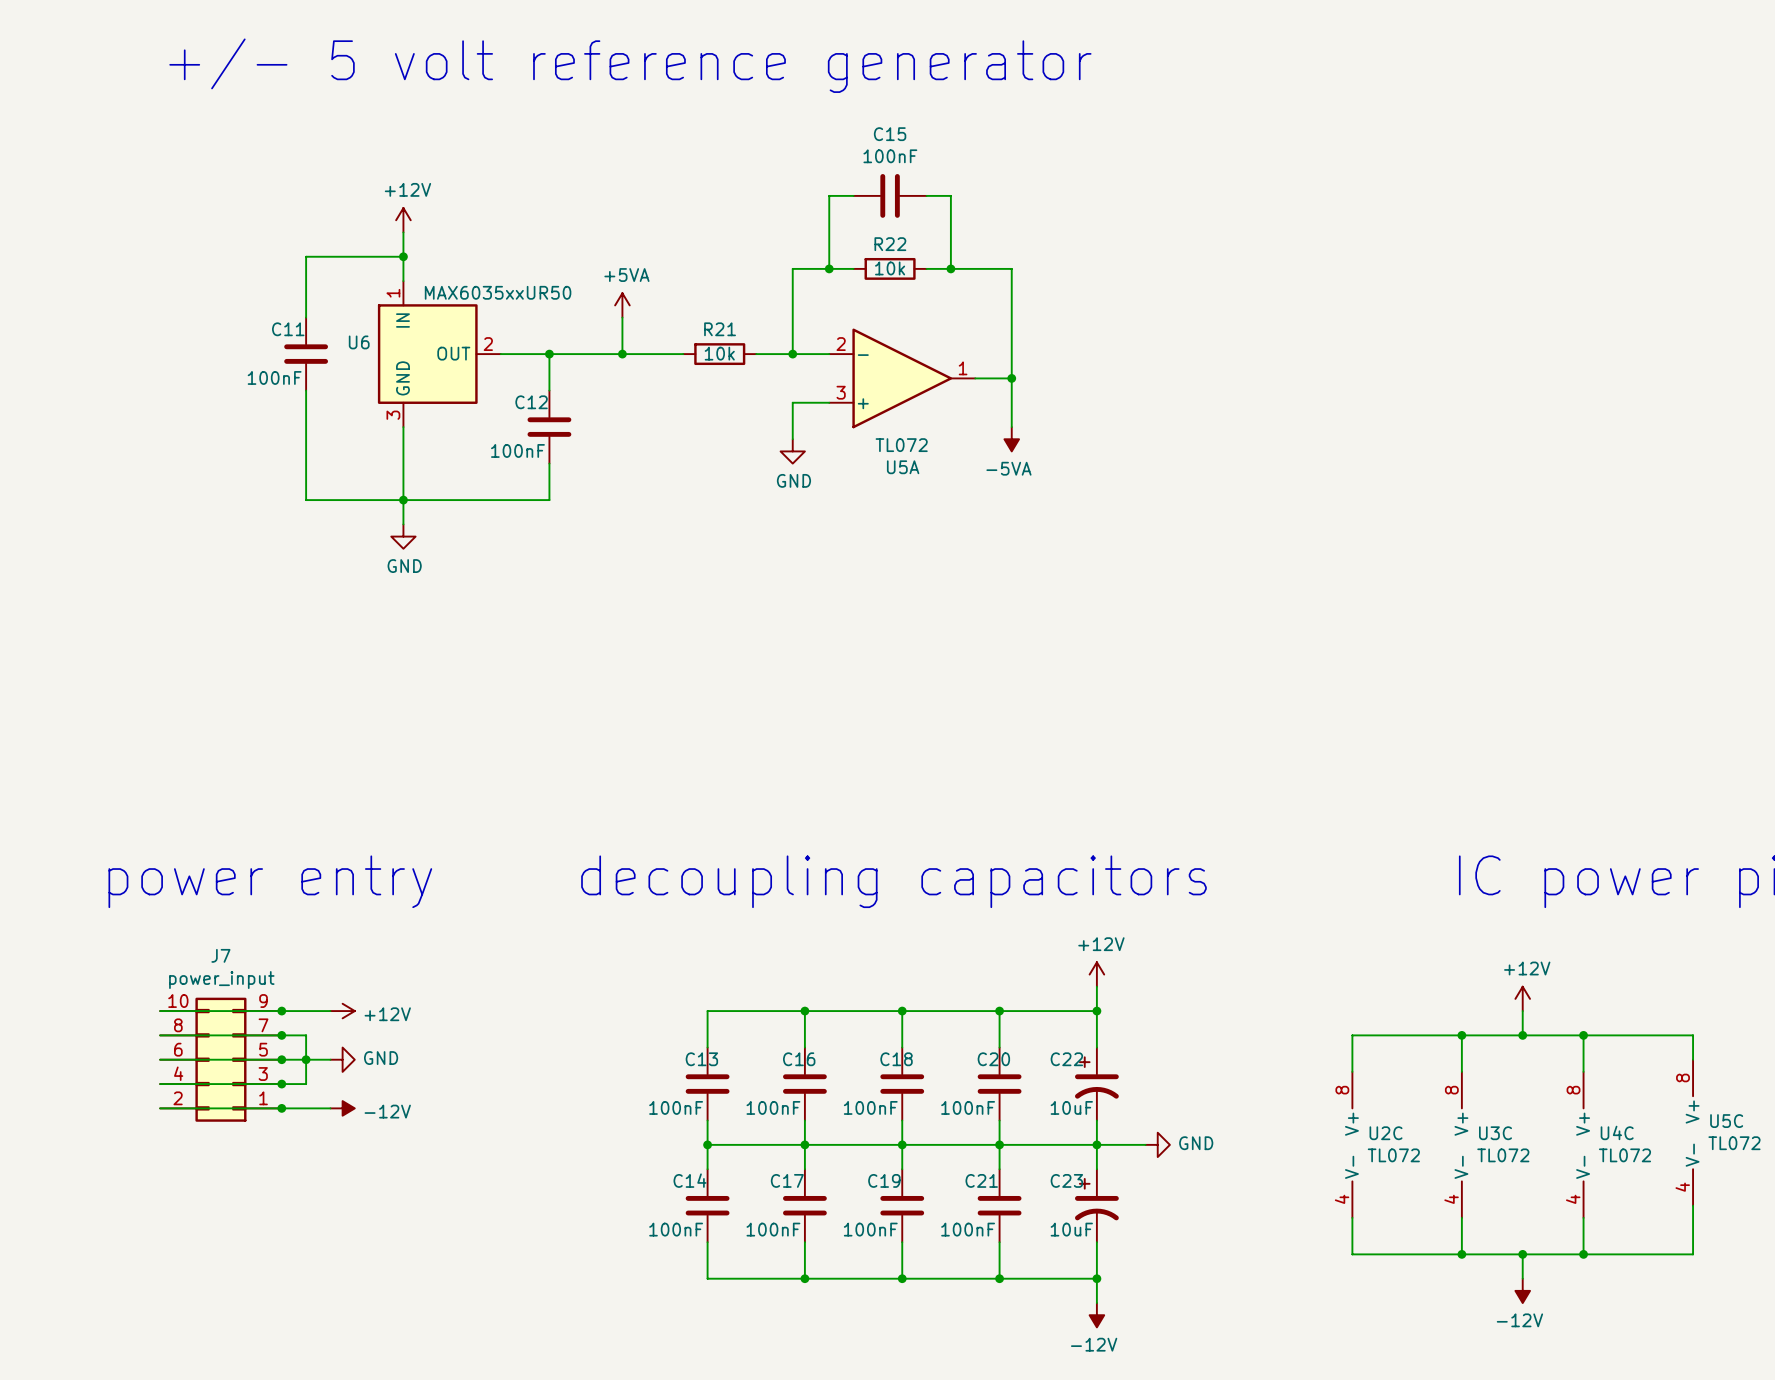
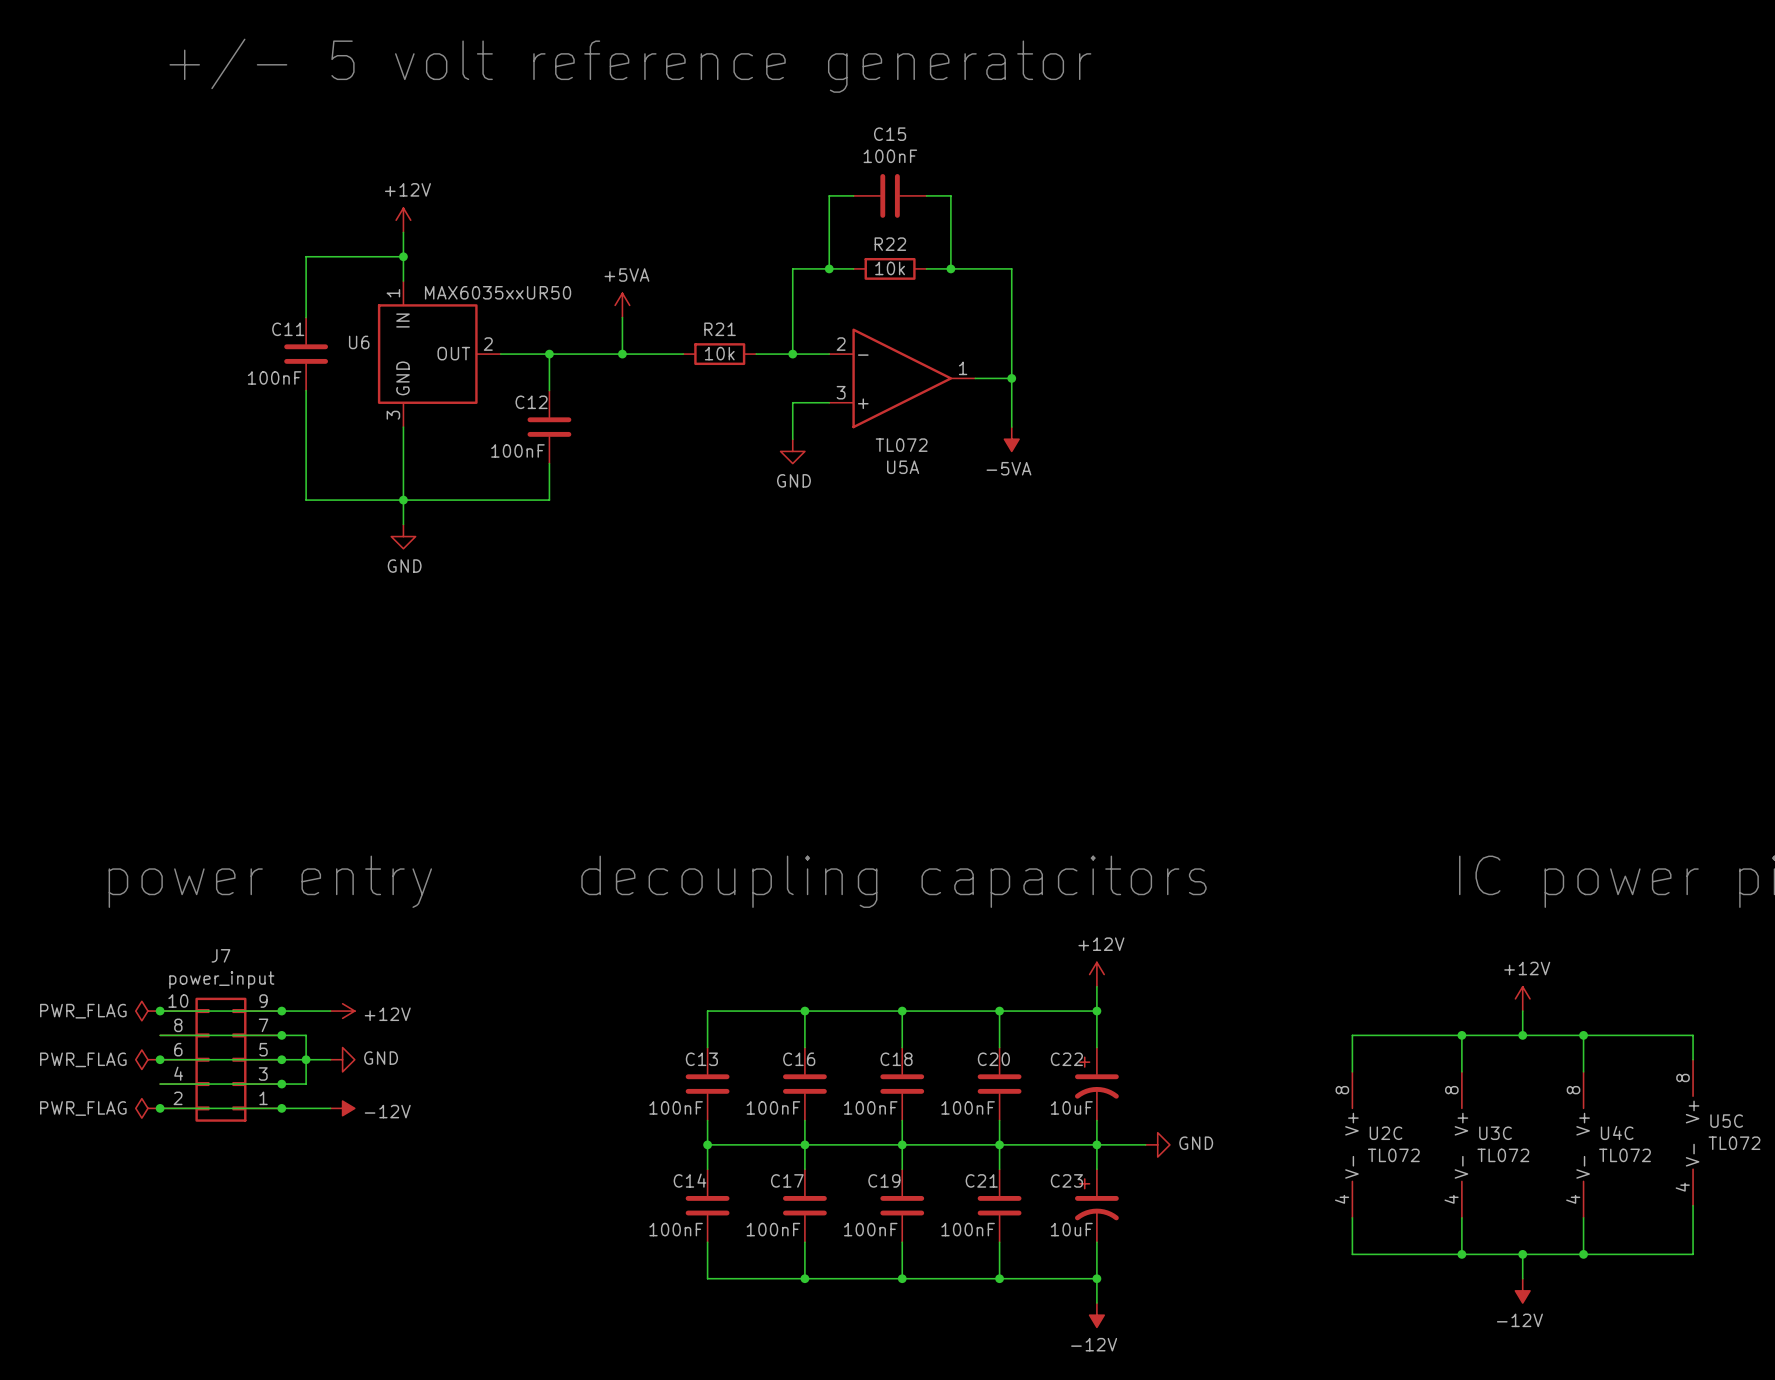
power symbol: none -> PWR_FLAG (147, 1011)
junction: none -> (160, 1011)
power symbol: none -> PWR_FLAG (147, 1059)
junction: none -> (160, 1059)
power symbol: none -> PWR_FLAG (147, 1108)
junction: none -> (160, 1108)

